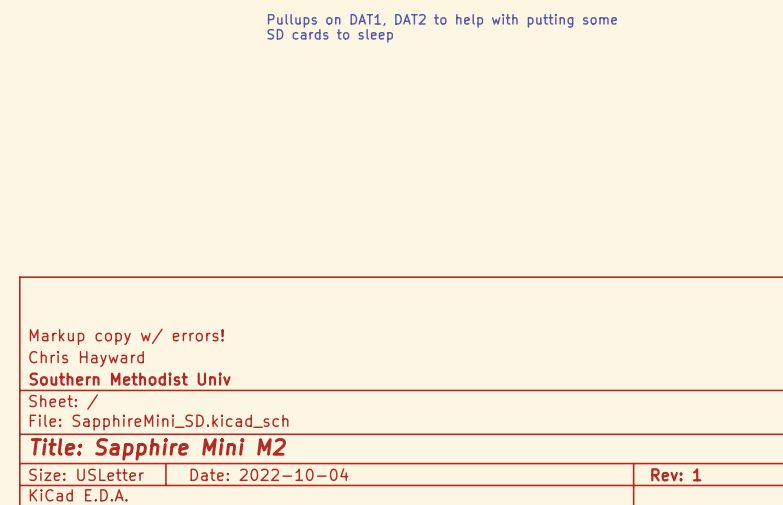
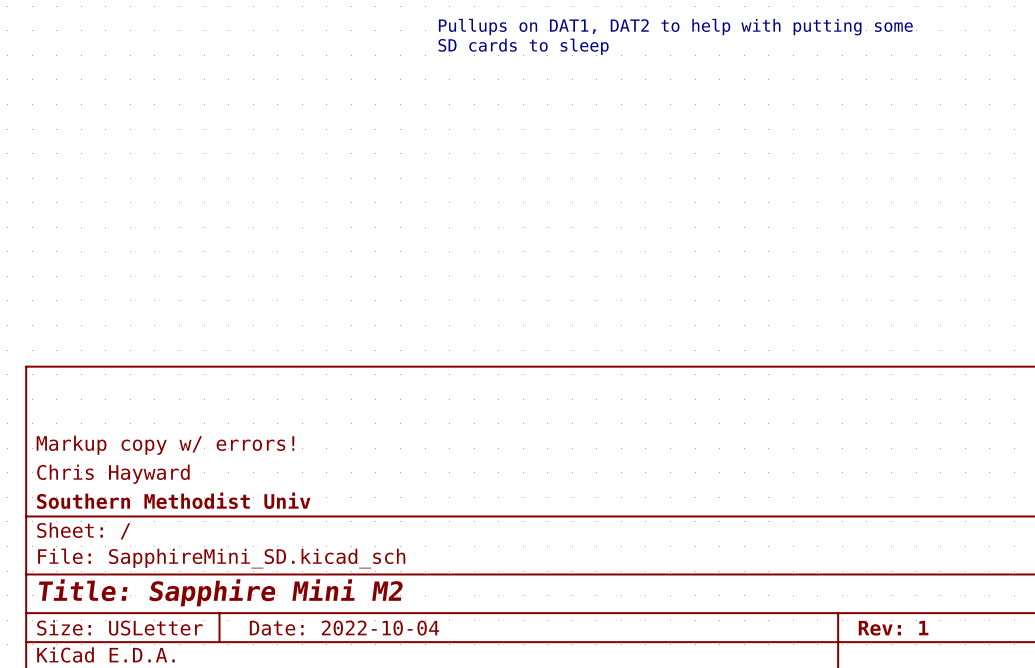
text position: Pullups on DAT1, DAT2 to help with putting some (442, 20) -> Pullups on DAT1, DAT2 to help with putting some (675, 27)
text position: SD cards to sleep (330, 35) -> SD cards to sleep (523, 46)

